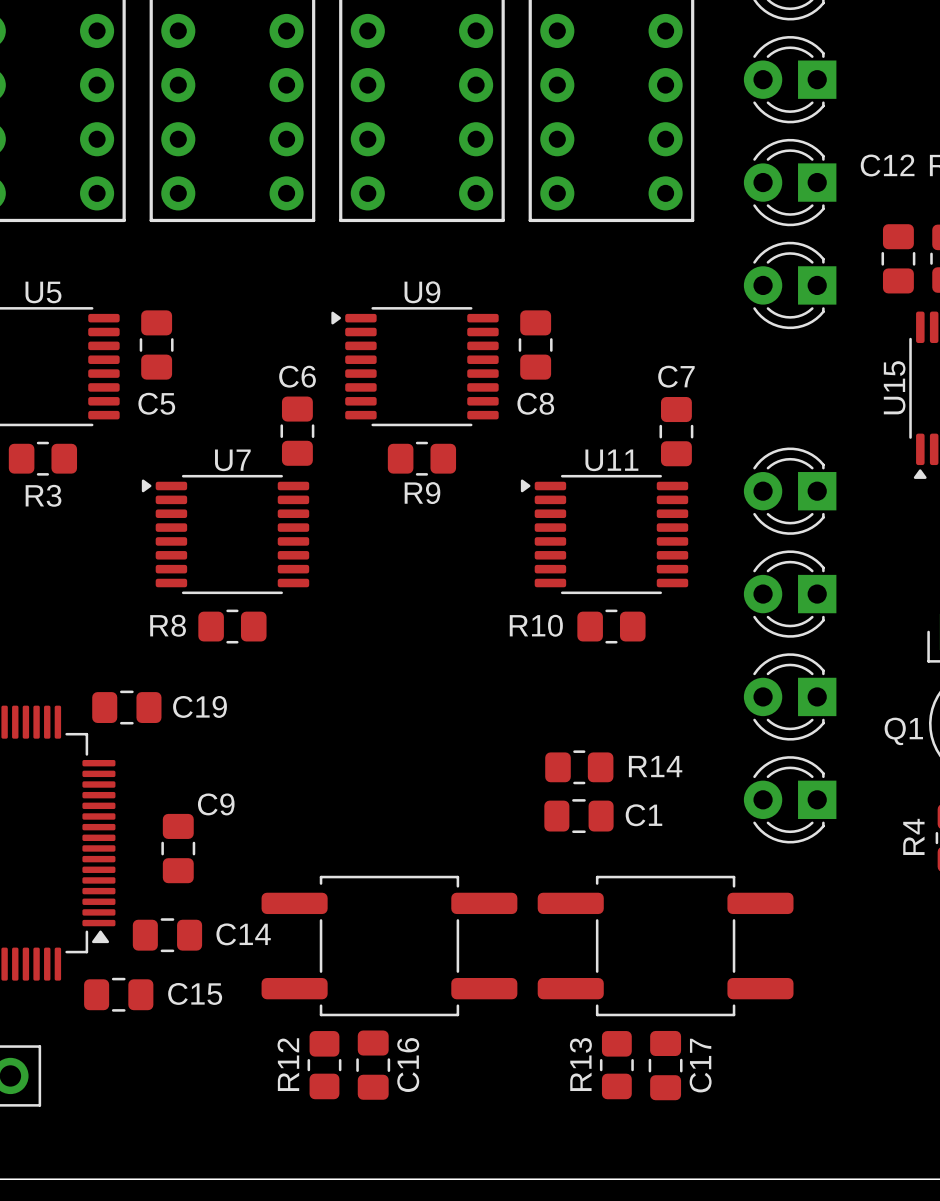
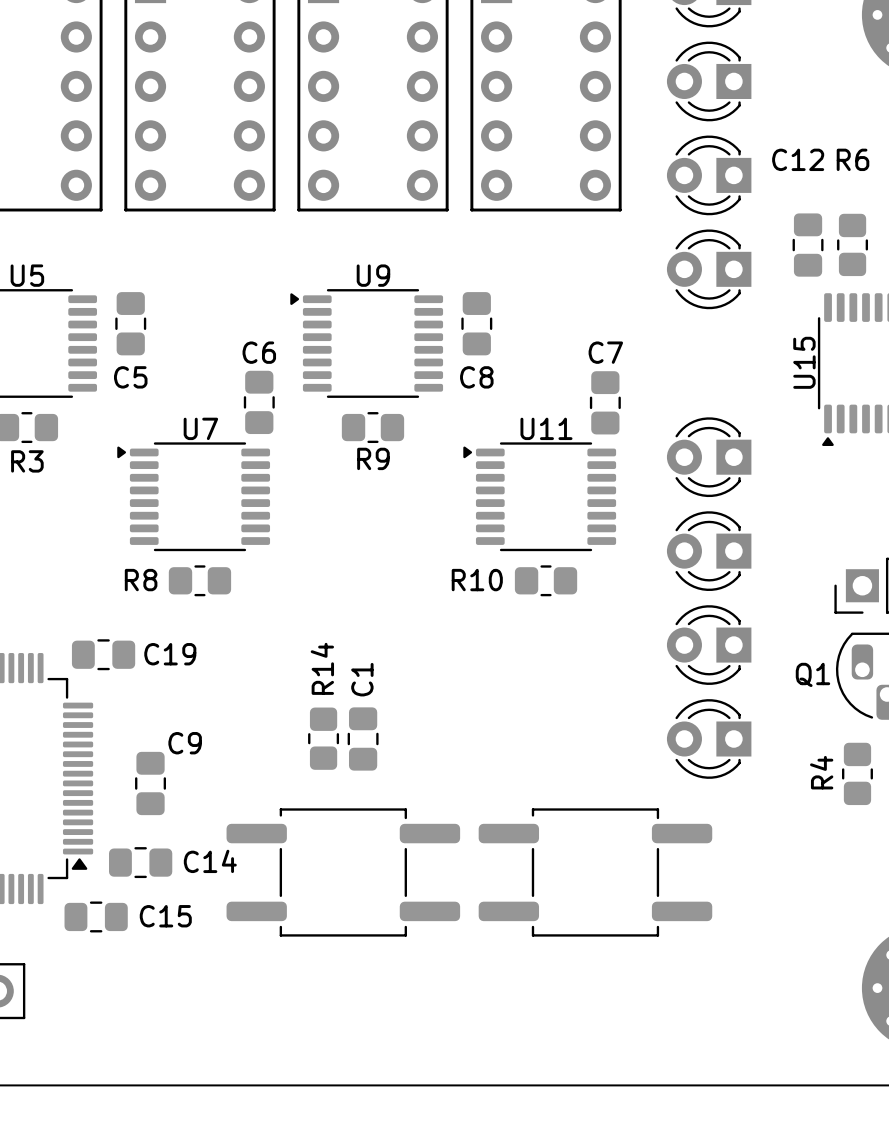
R14 name position: R14 (655, 766) -> R14 (322, 668)
R14 rotation: 0° (579, 767) -> 90° clockwise (323, 738)
R14 position: (579, 767) -> (323, 738)
C1 name position: C1 (643, 815) -> C1 (362, 679)
C1 rotation: 0° (578, 816) -> 90° clockwise (363, 738)
C1 position: (578, 816) -> (363, 738)
R12: (324, 1065) -> none
C16: (373, 1065) -> none
R13: (616, 1065) -> none
C17: (665, 1065) -> none

